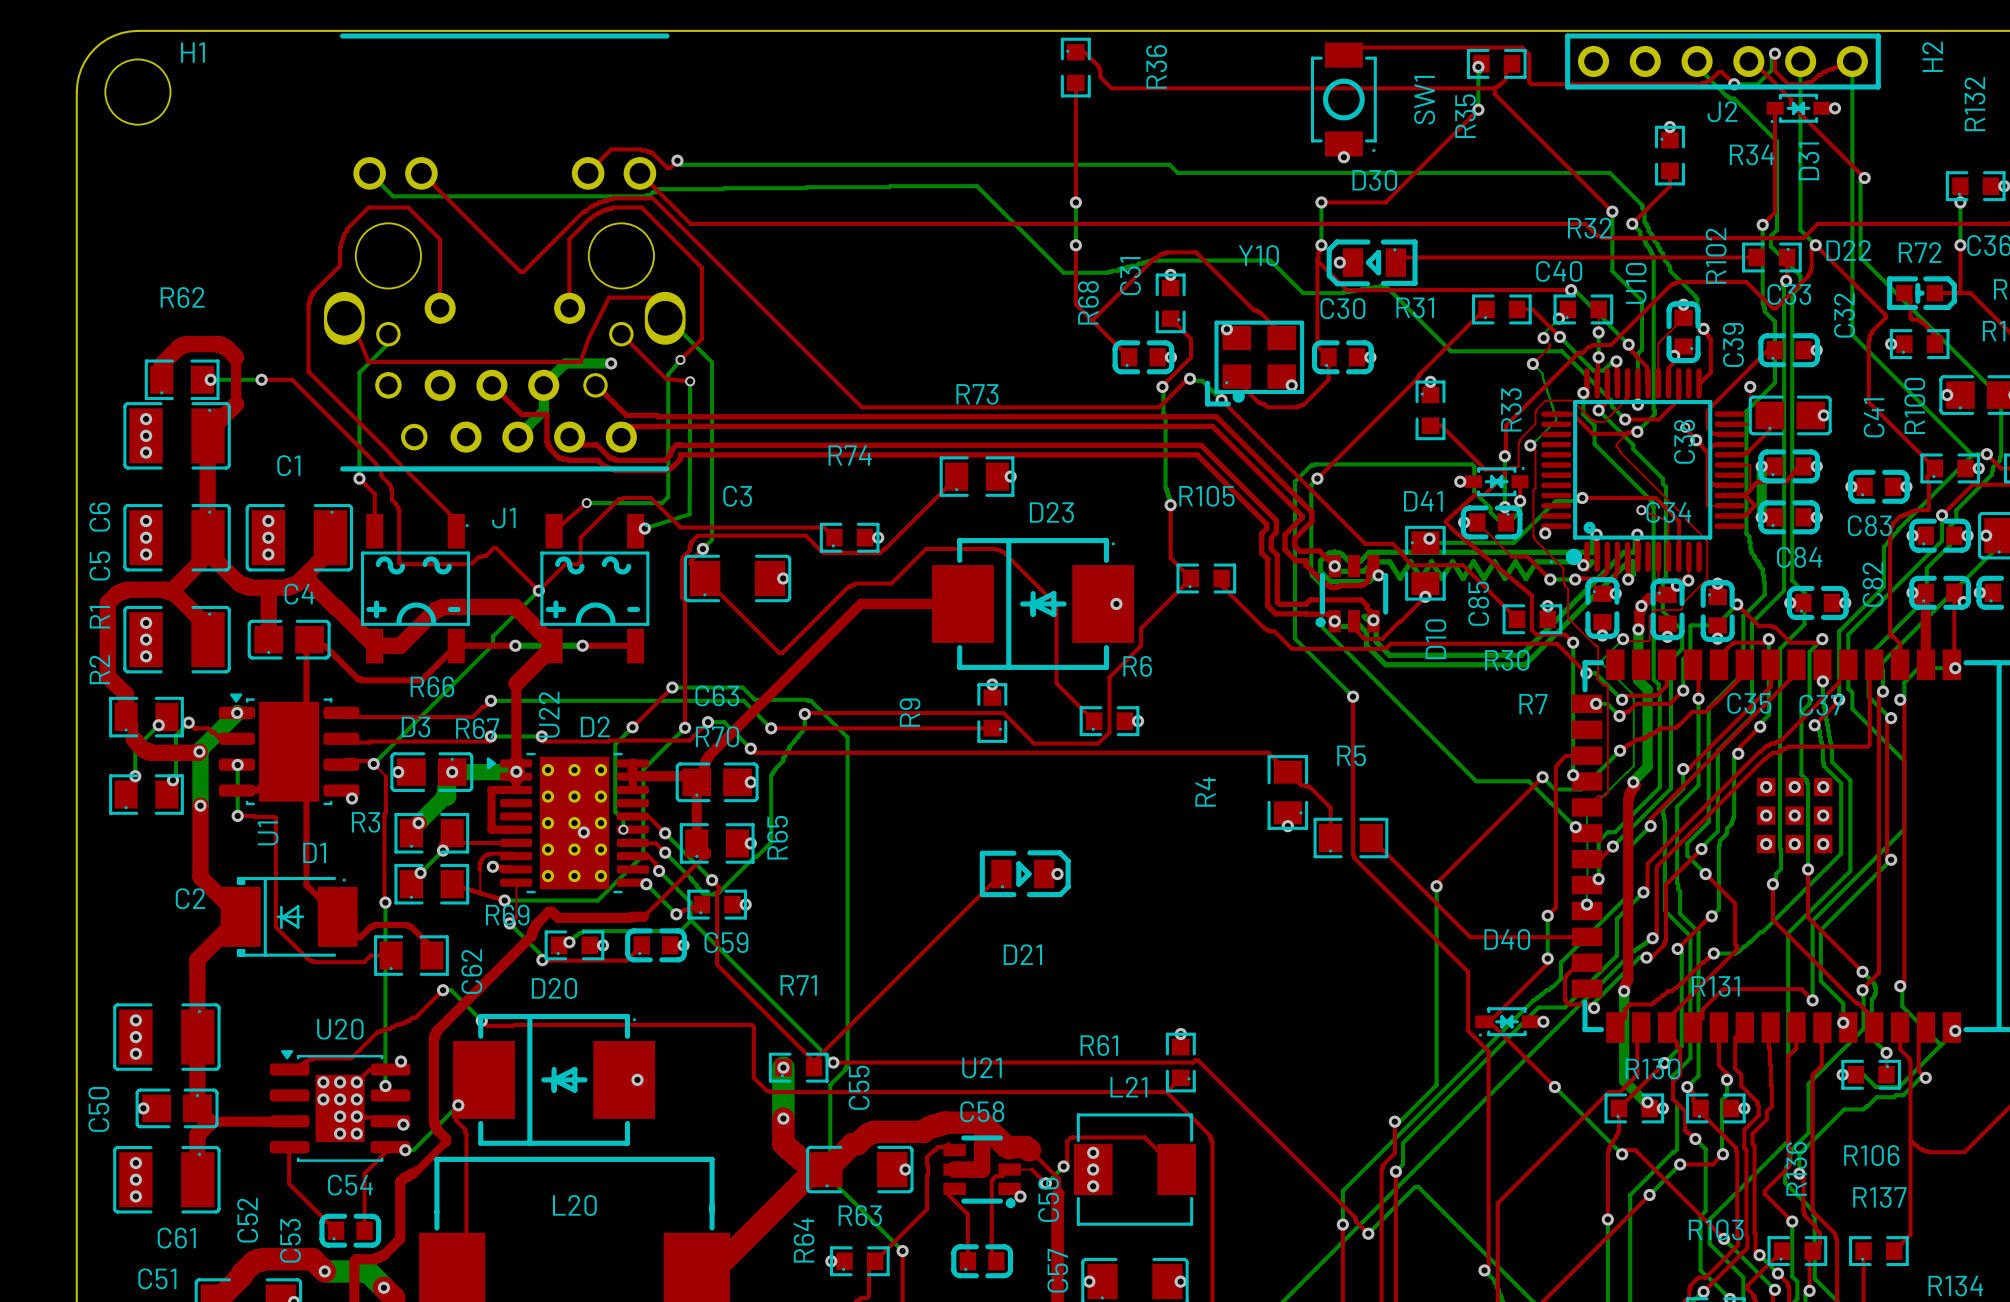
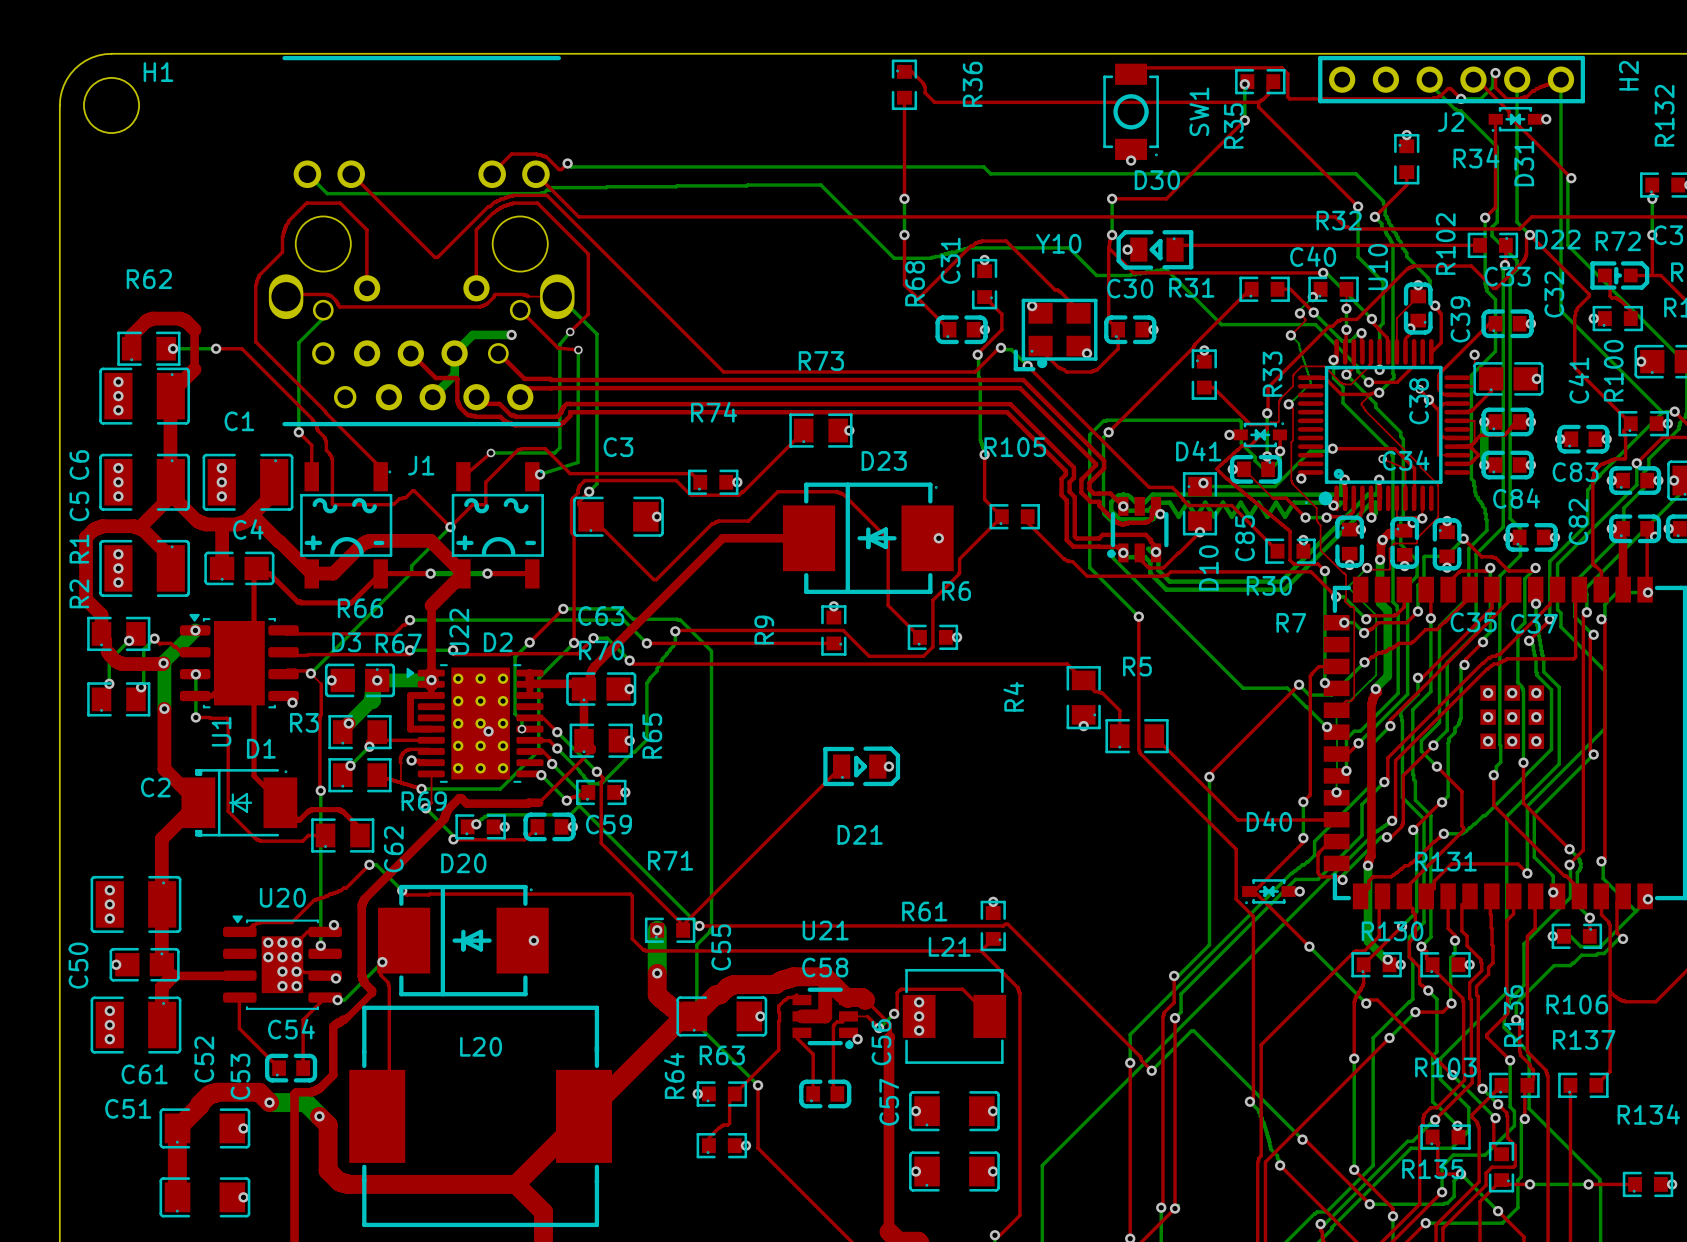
top track: (665, 318) (653, 297) (609, 297) (588, 338) (580, 361) (368, 361) (356, 331) -> (557, 296) (495, 294) (486, 304) (479, 306) (339, 306) (331, 296) (326, 294) (288, 294)

